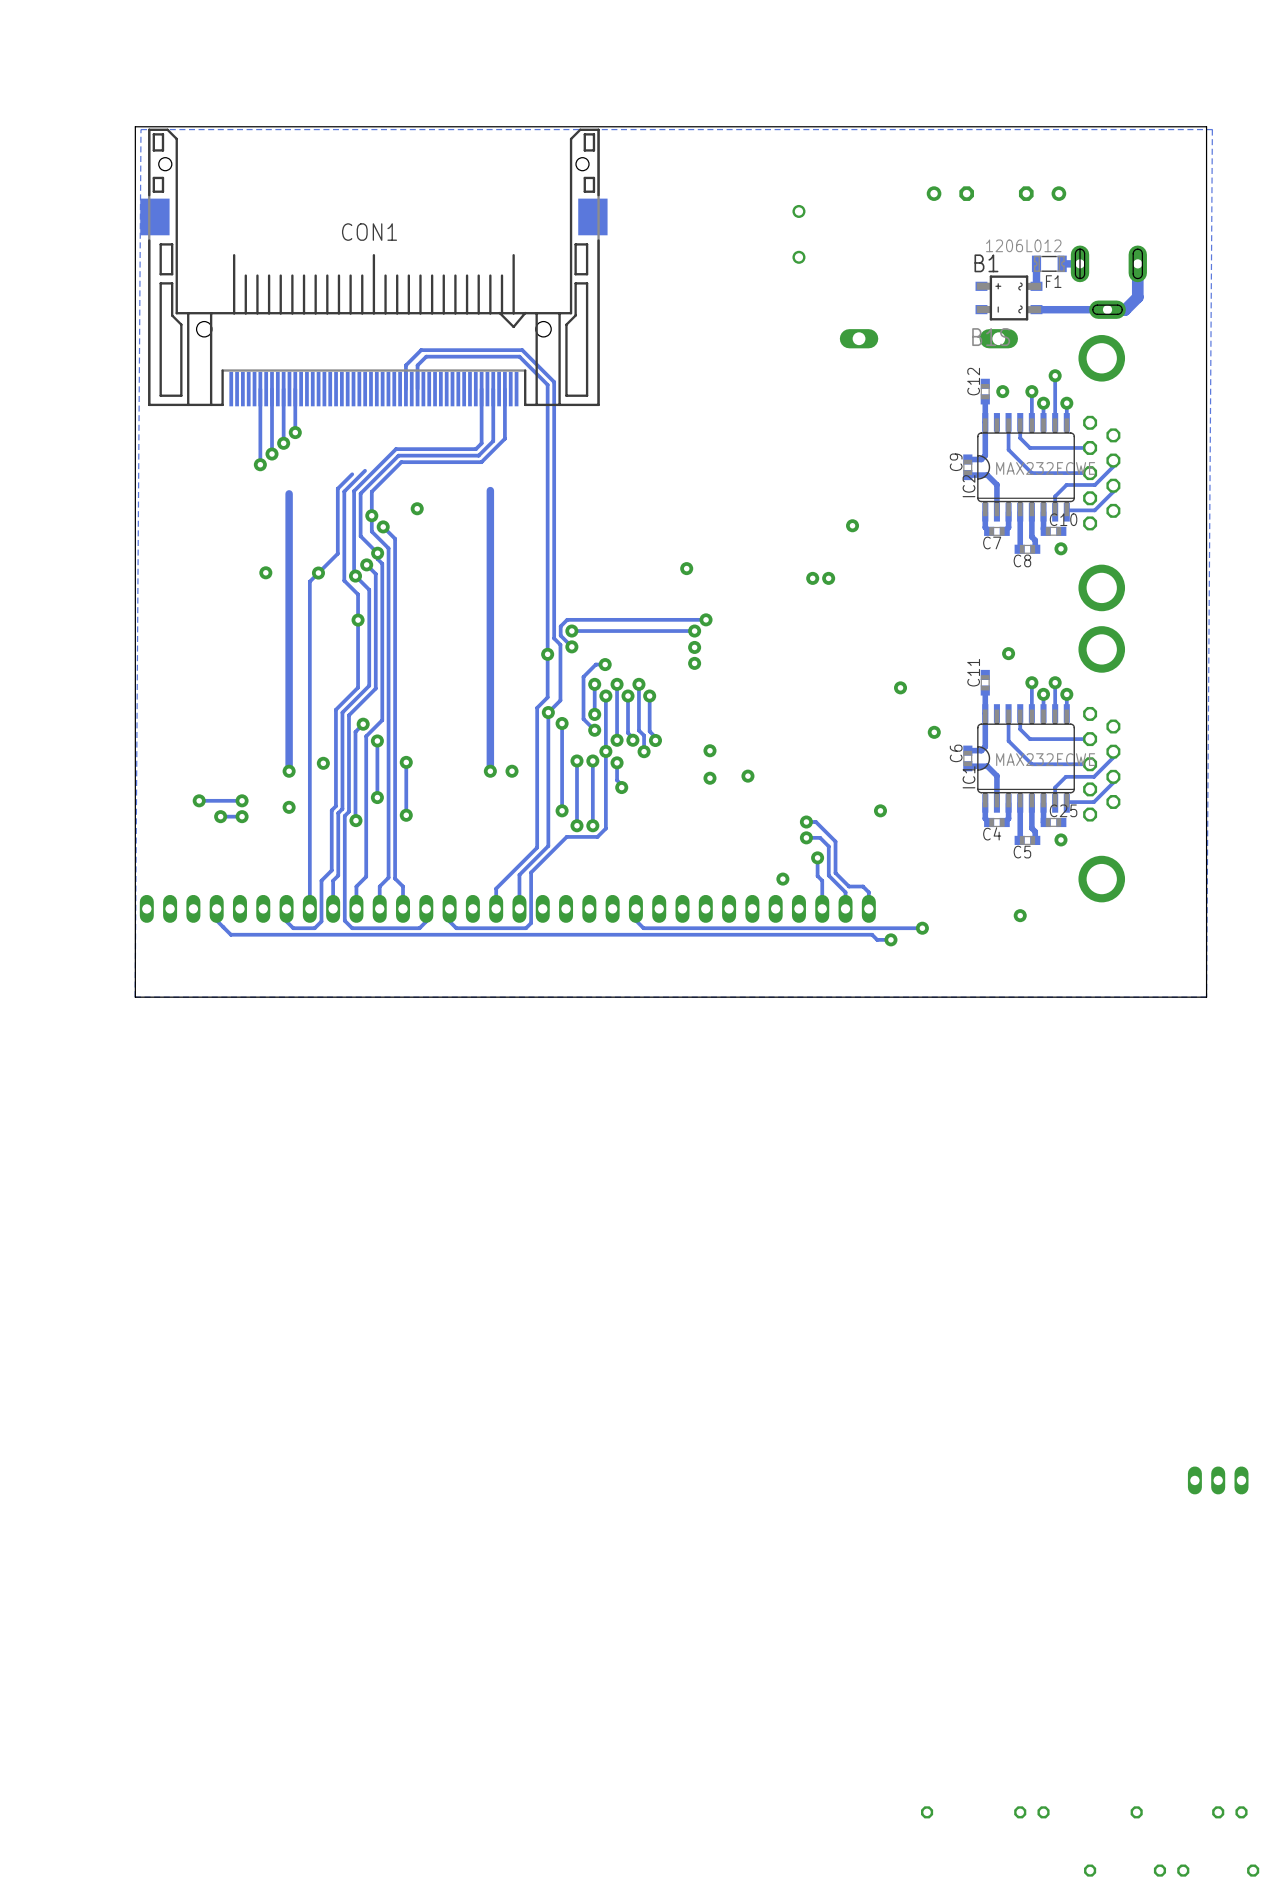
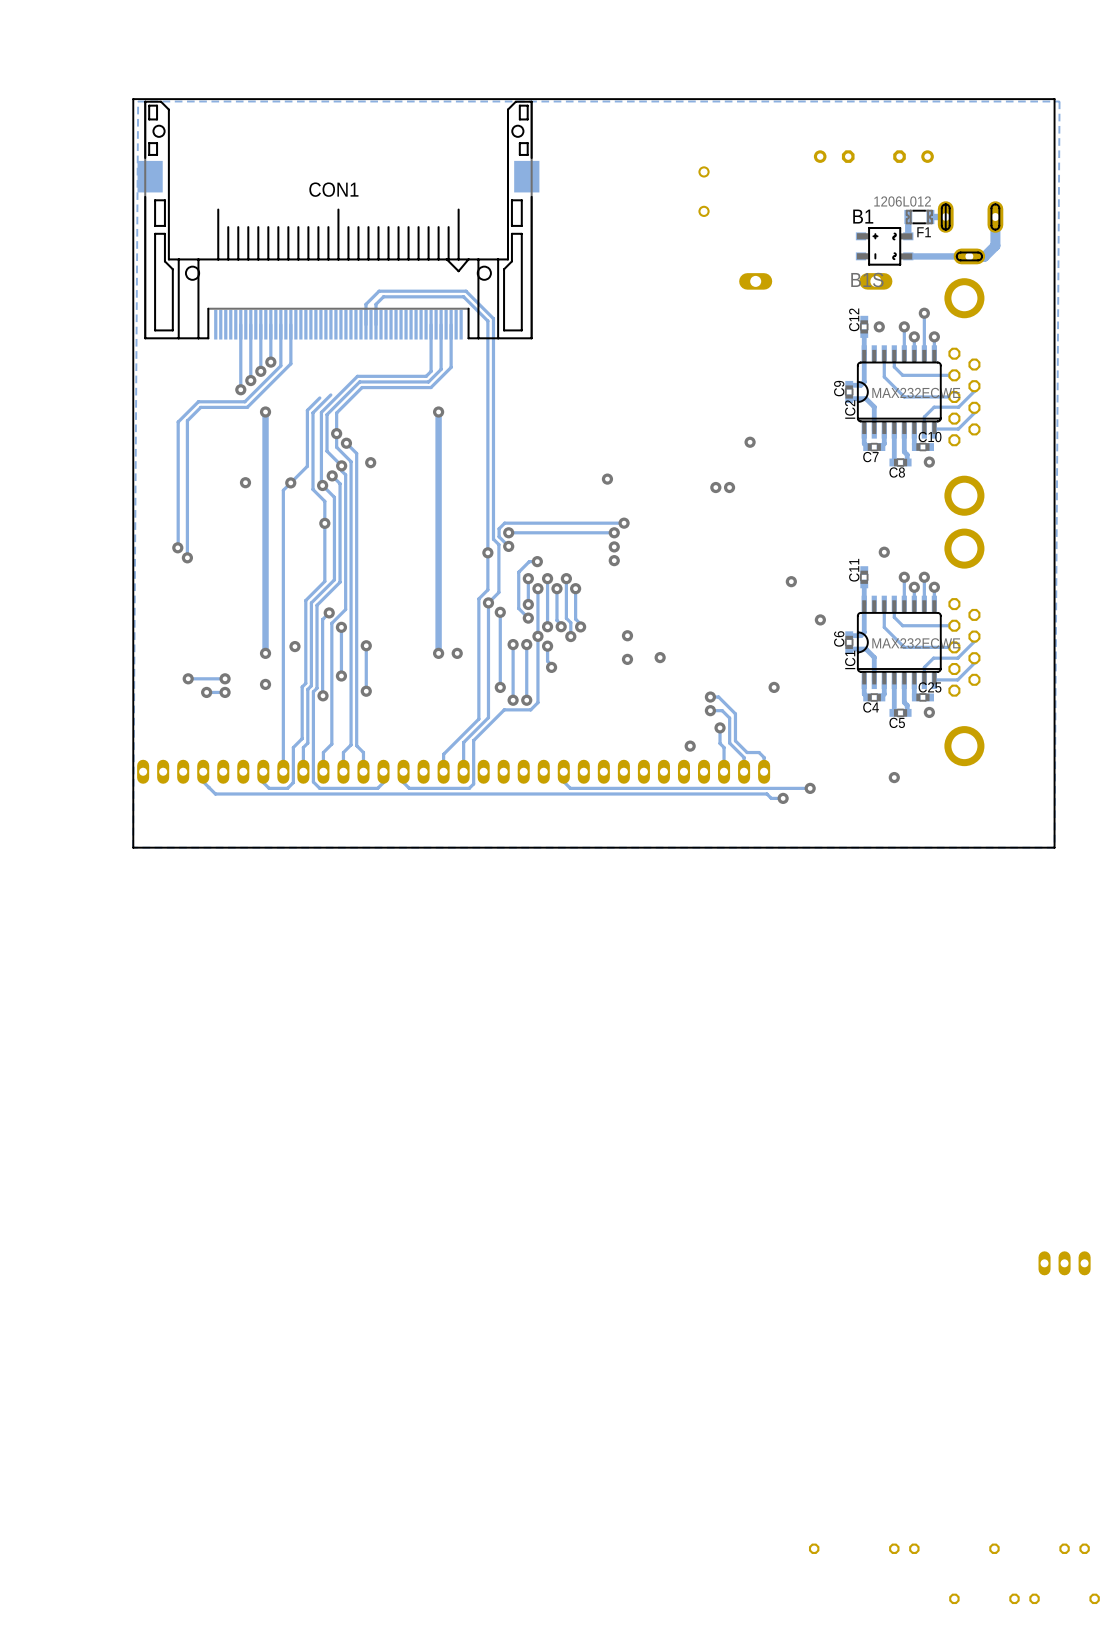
track: none -> (280, 324) (280, 365) (244, 401) (198, 401) (178, 422) (177, 547)
track: none -> (290, 324) (290, 363) (247, 407) (200, 407) (187, 420) (187, 557)
via: none -> (265, 411)
via: none -> (438, 411)
via: (417, 508) -> none
via: none -> (370, 462)
via: none -> (177, 547)
via: none -> (187, 557)

